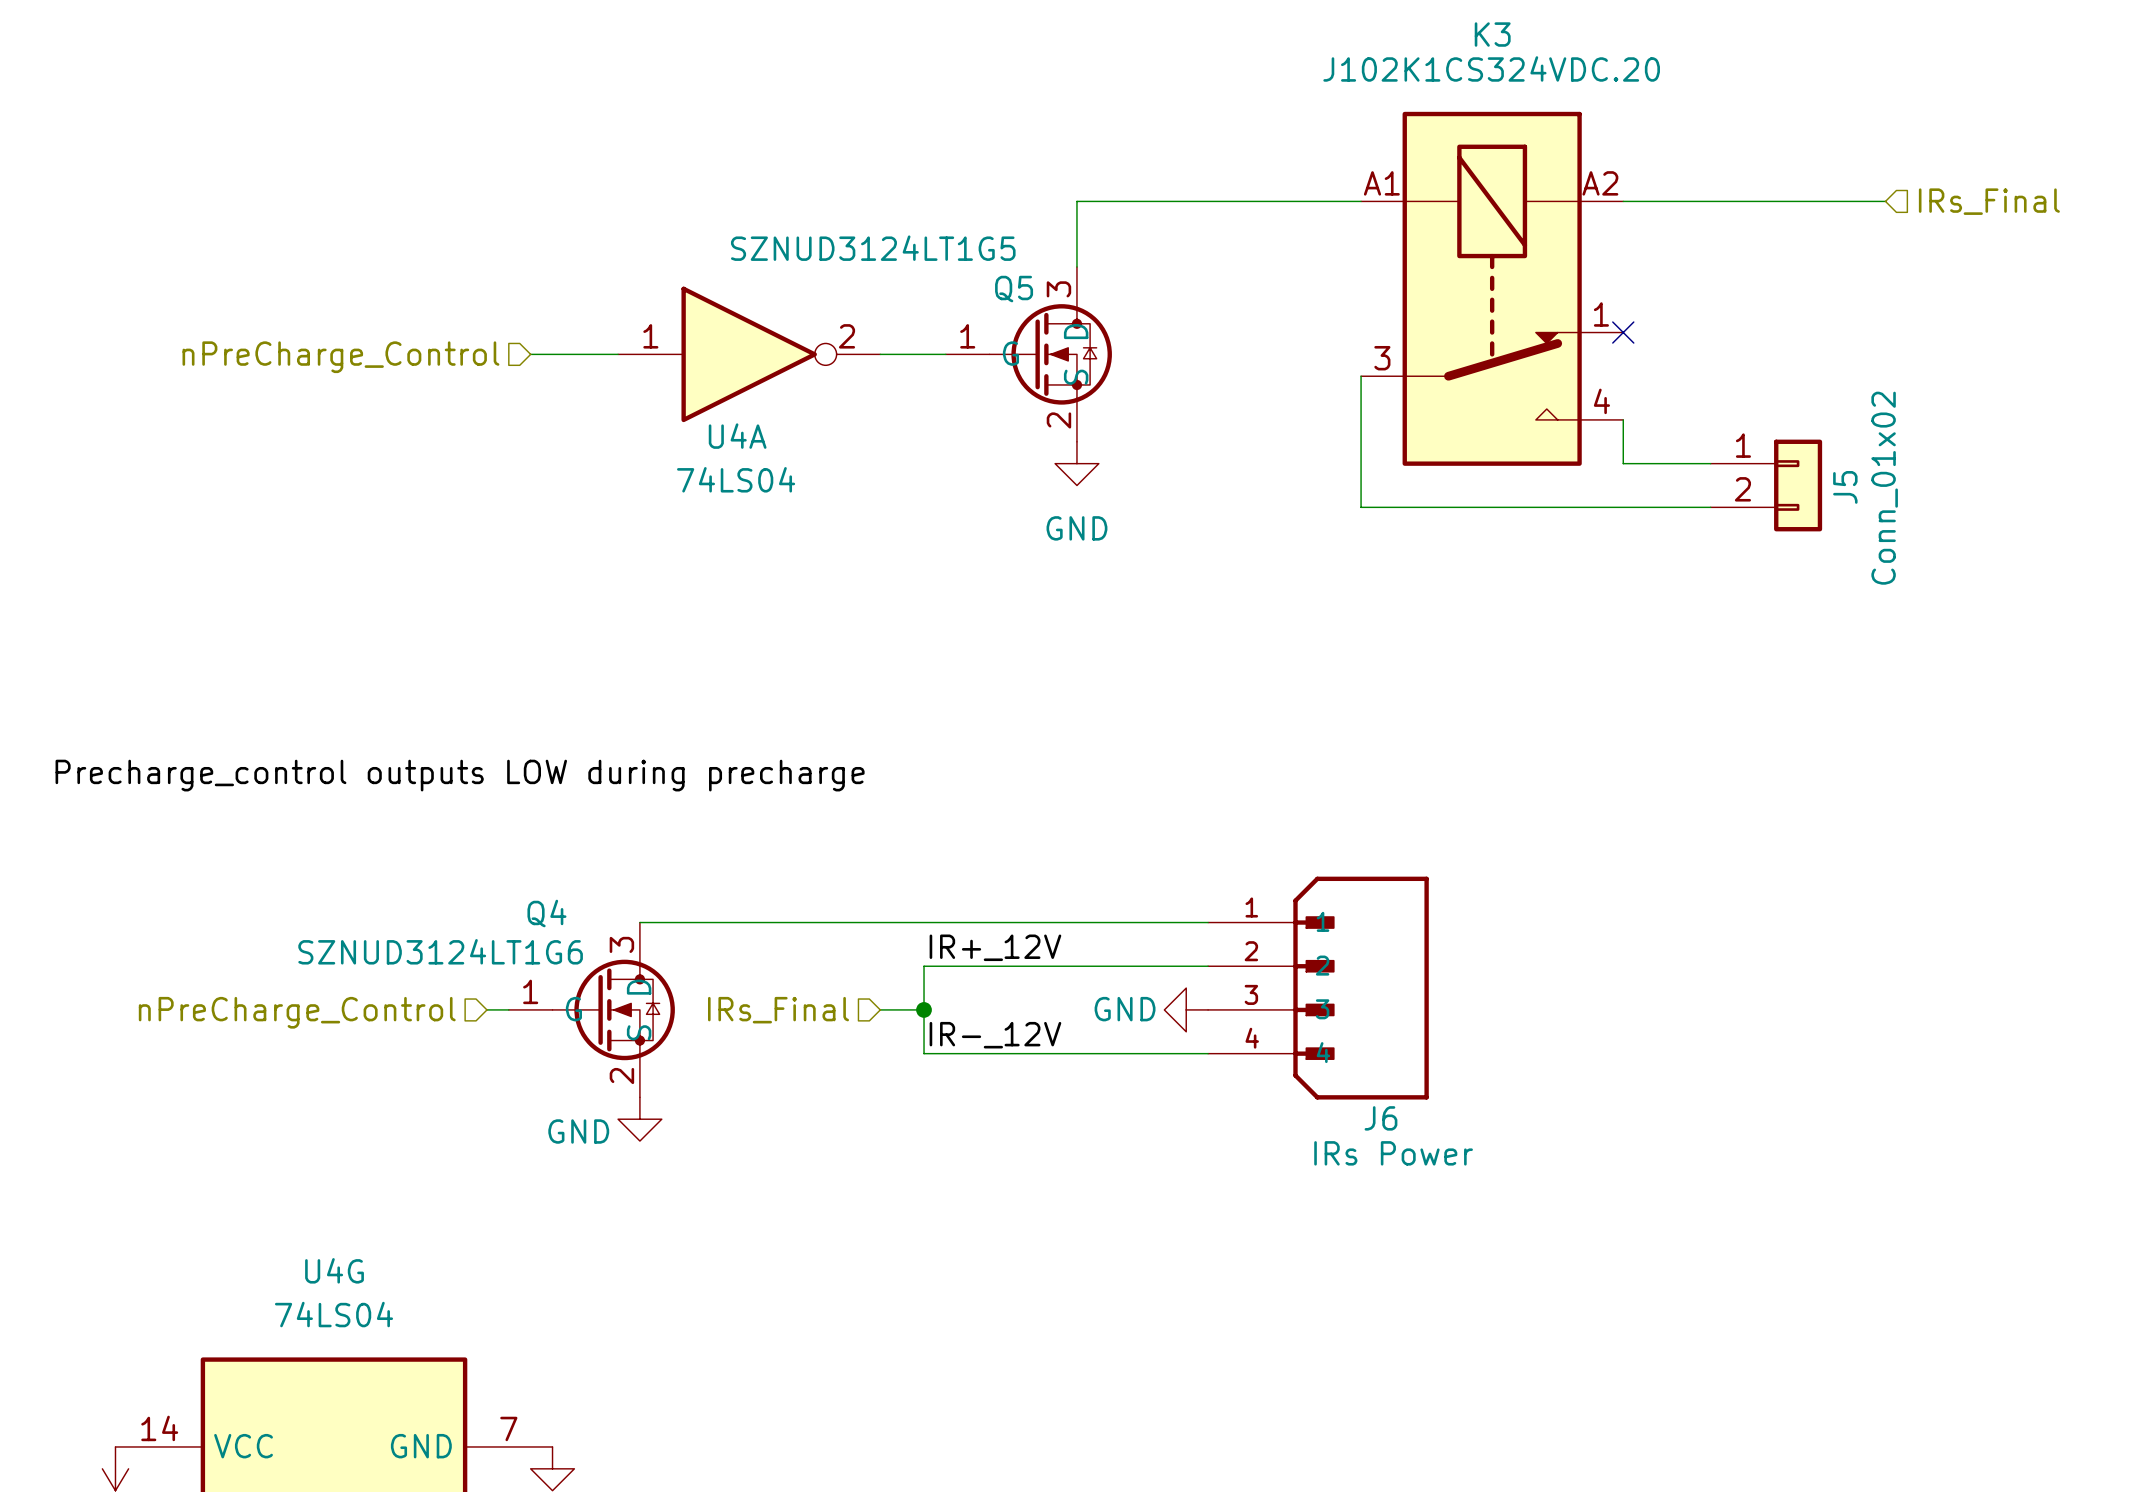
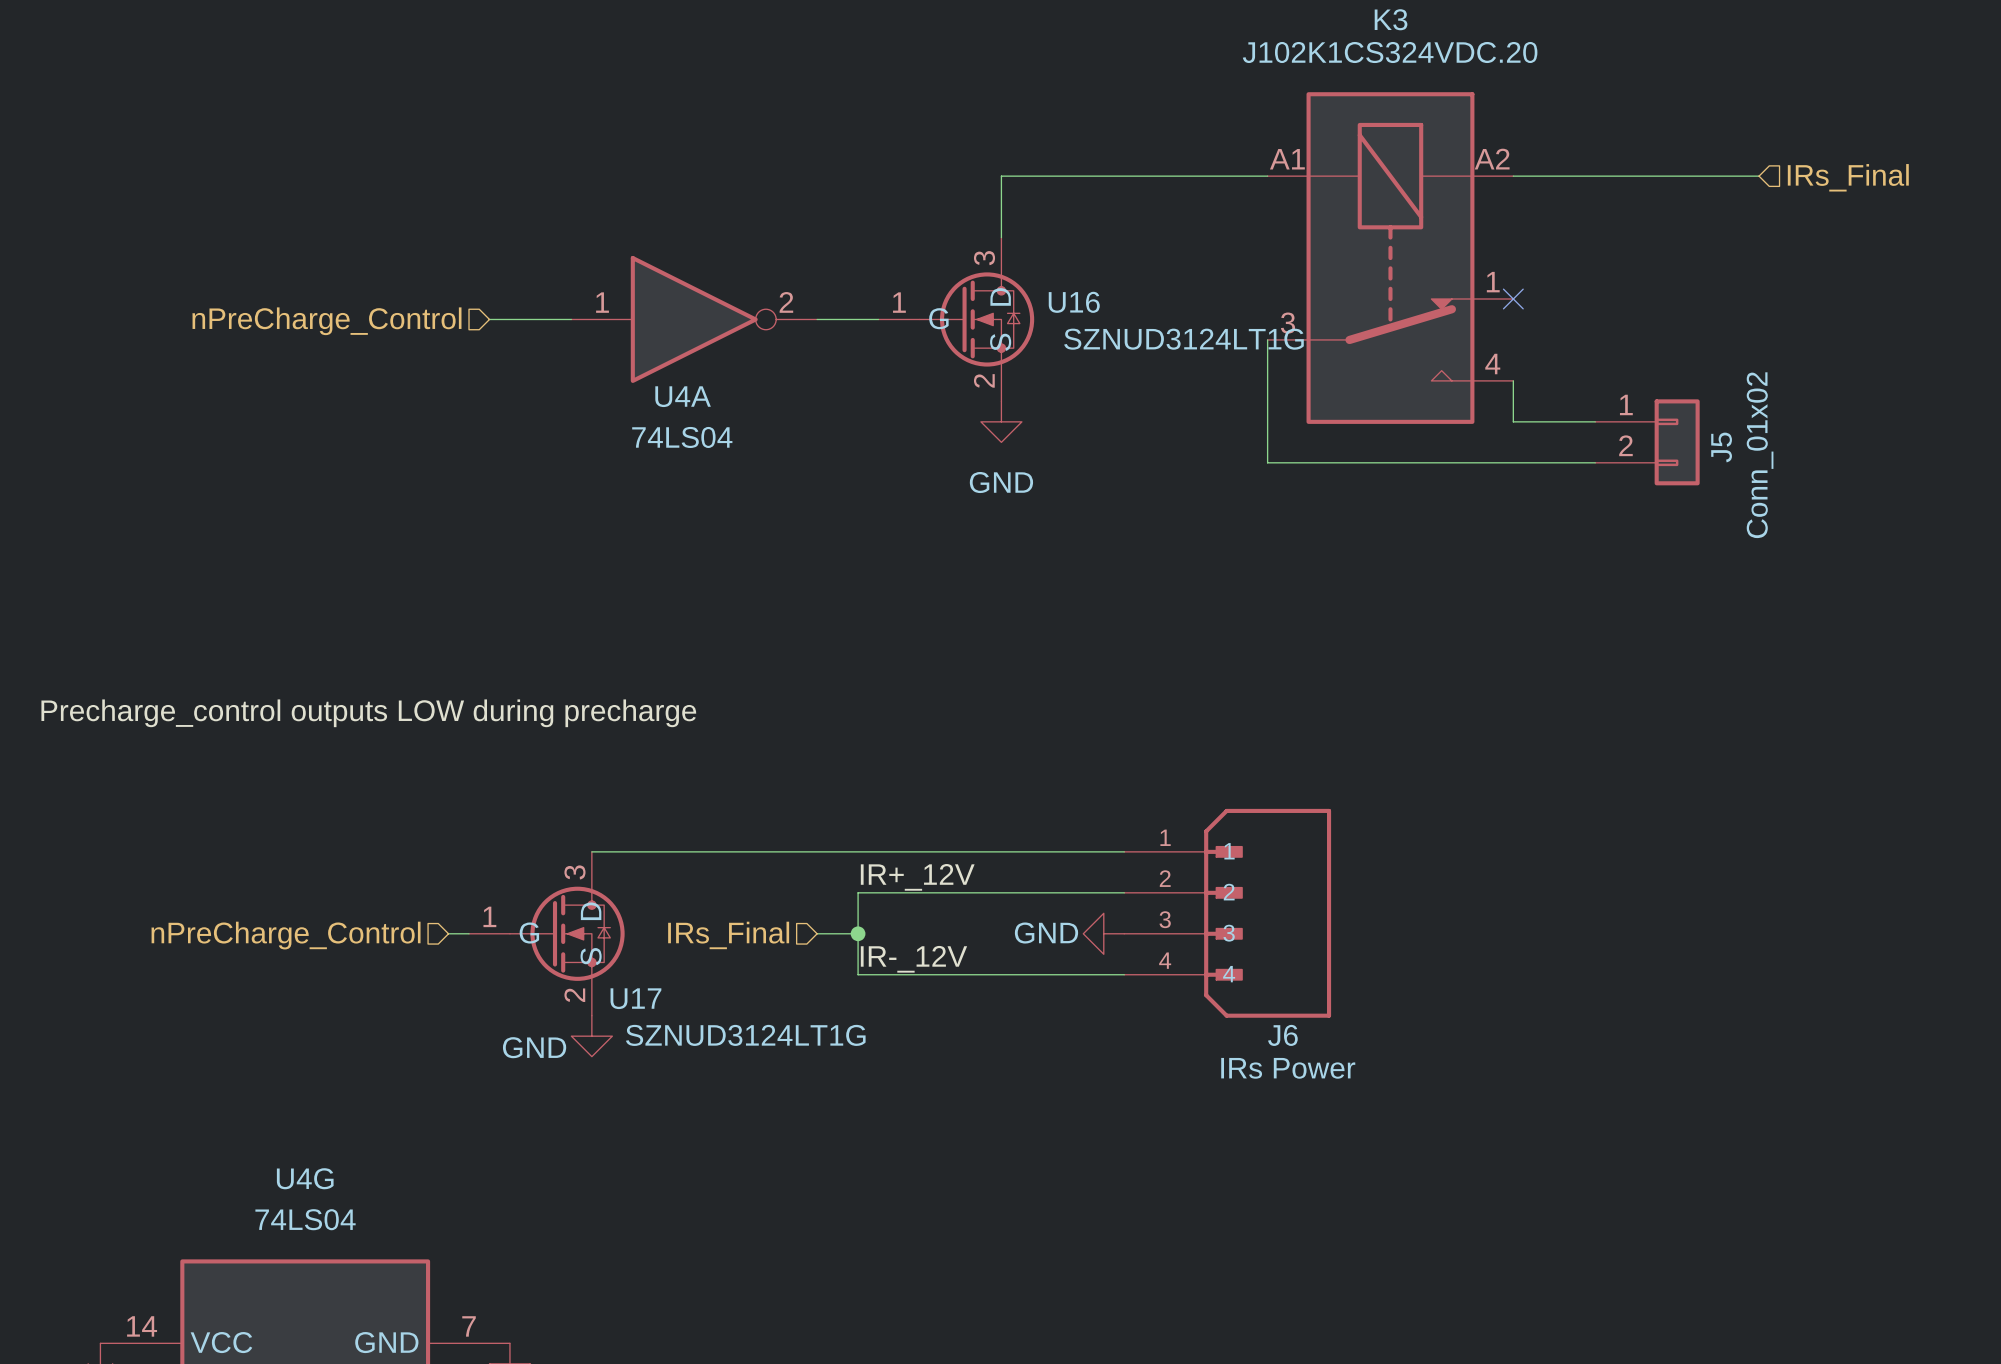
SZNUD3124LT1G5 name: SZNUD3124LT1G5 (873, 248) -> U16 (1074, 302)
SZNUD3124LT1G5 value: Q5 (1014, 289) -> SZNUD3124LT1G (1183, 339)
SZNUD3124LT1G6 value: Q4 (546, 913) -> SZNUD3124LT1G (745, 1035)
SZNUD3124LT1G6 name: SZNUD3124LT1G6 (440, 951) -> U17 (635, 998)

